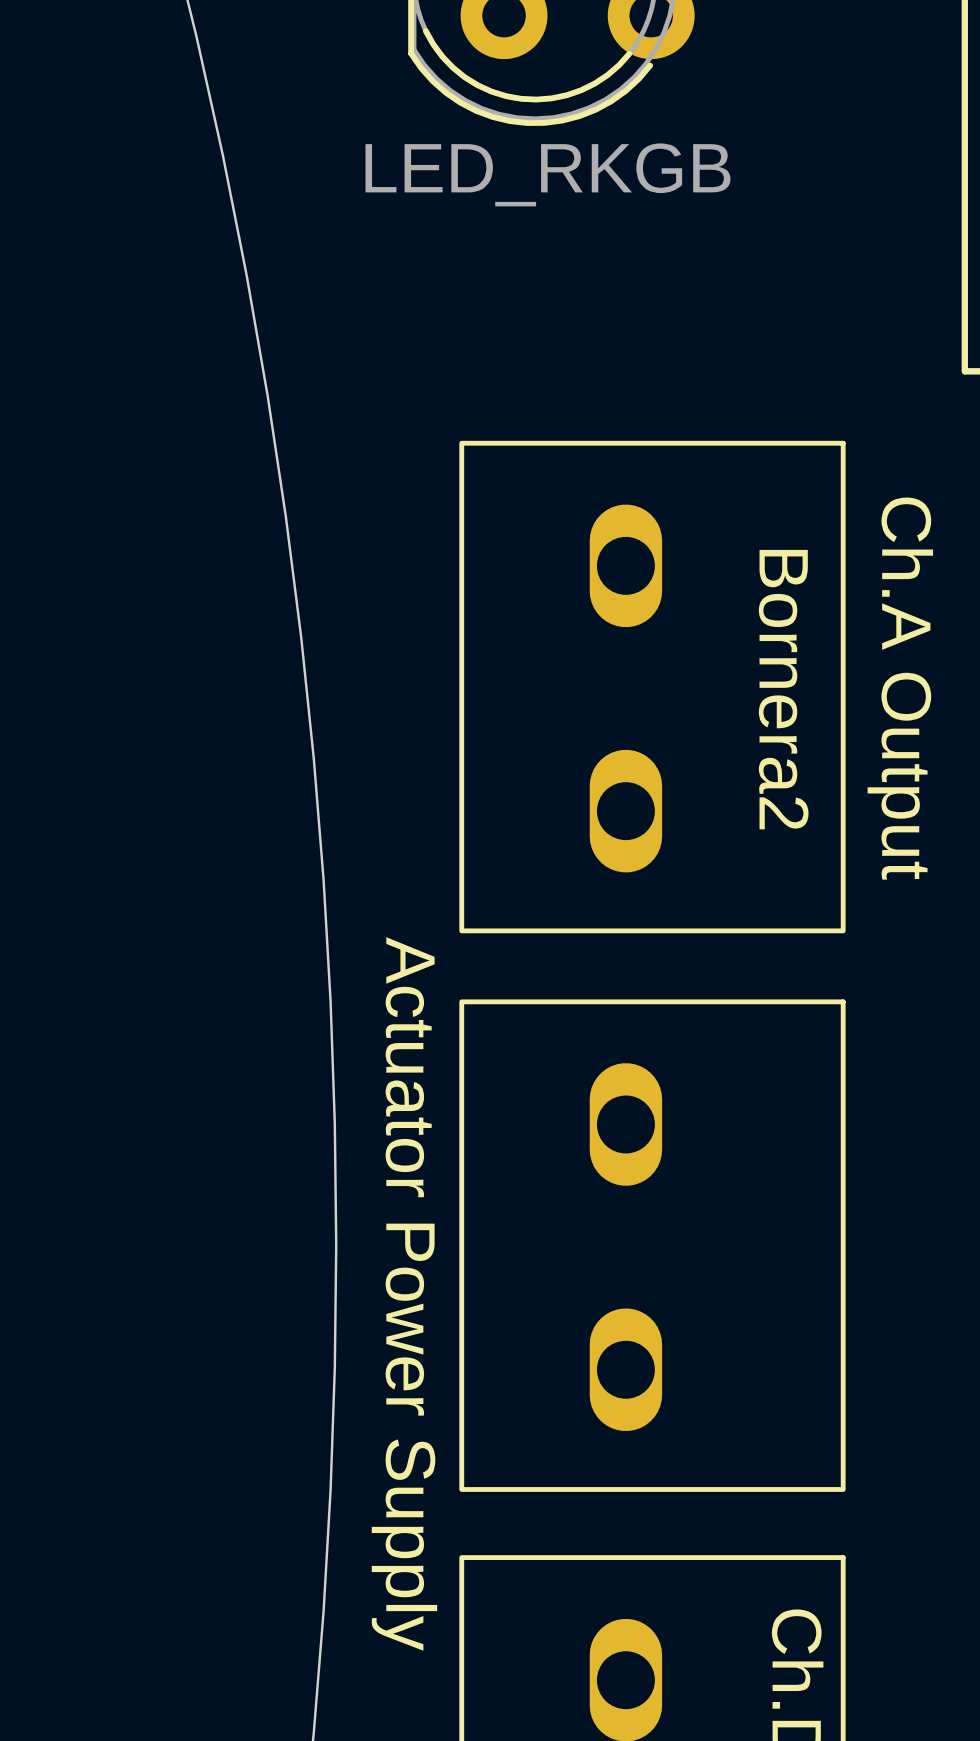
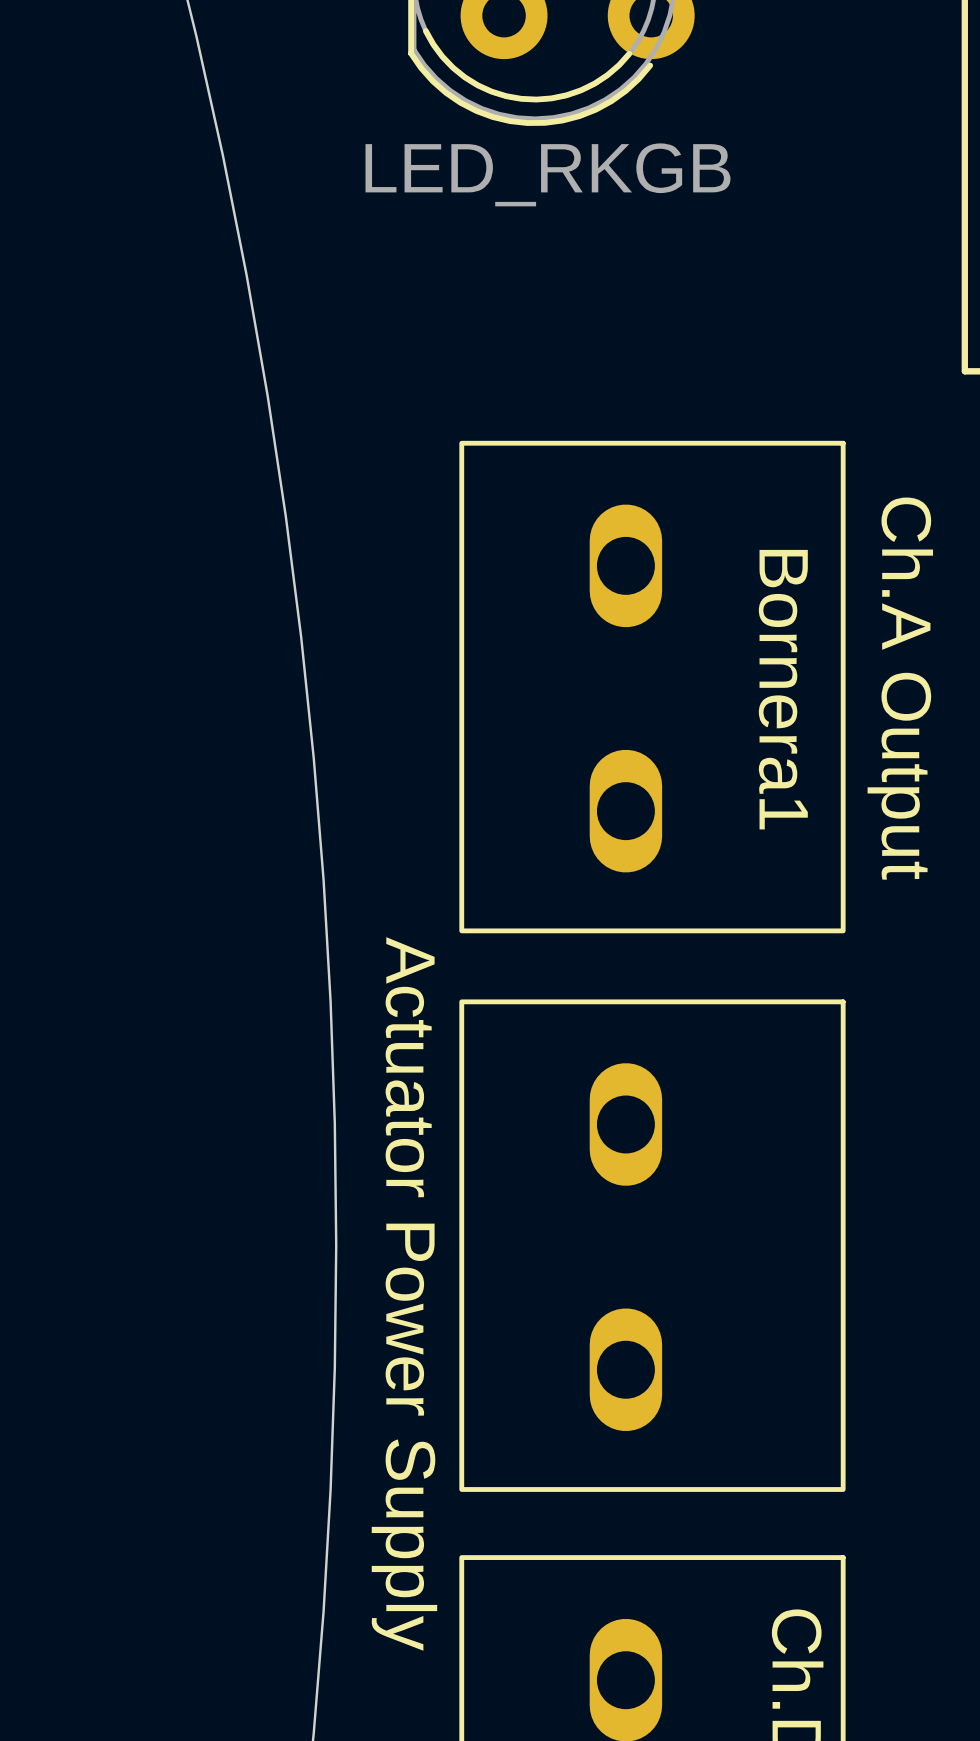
Bornera2 name: Bornera2 (783, 689) -> Bornera1 (783, 689)

